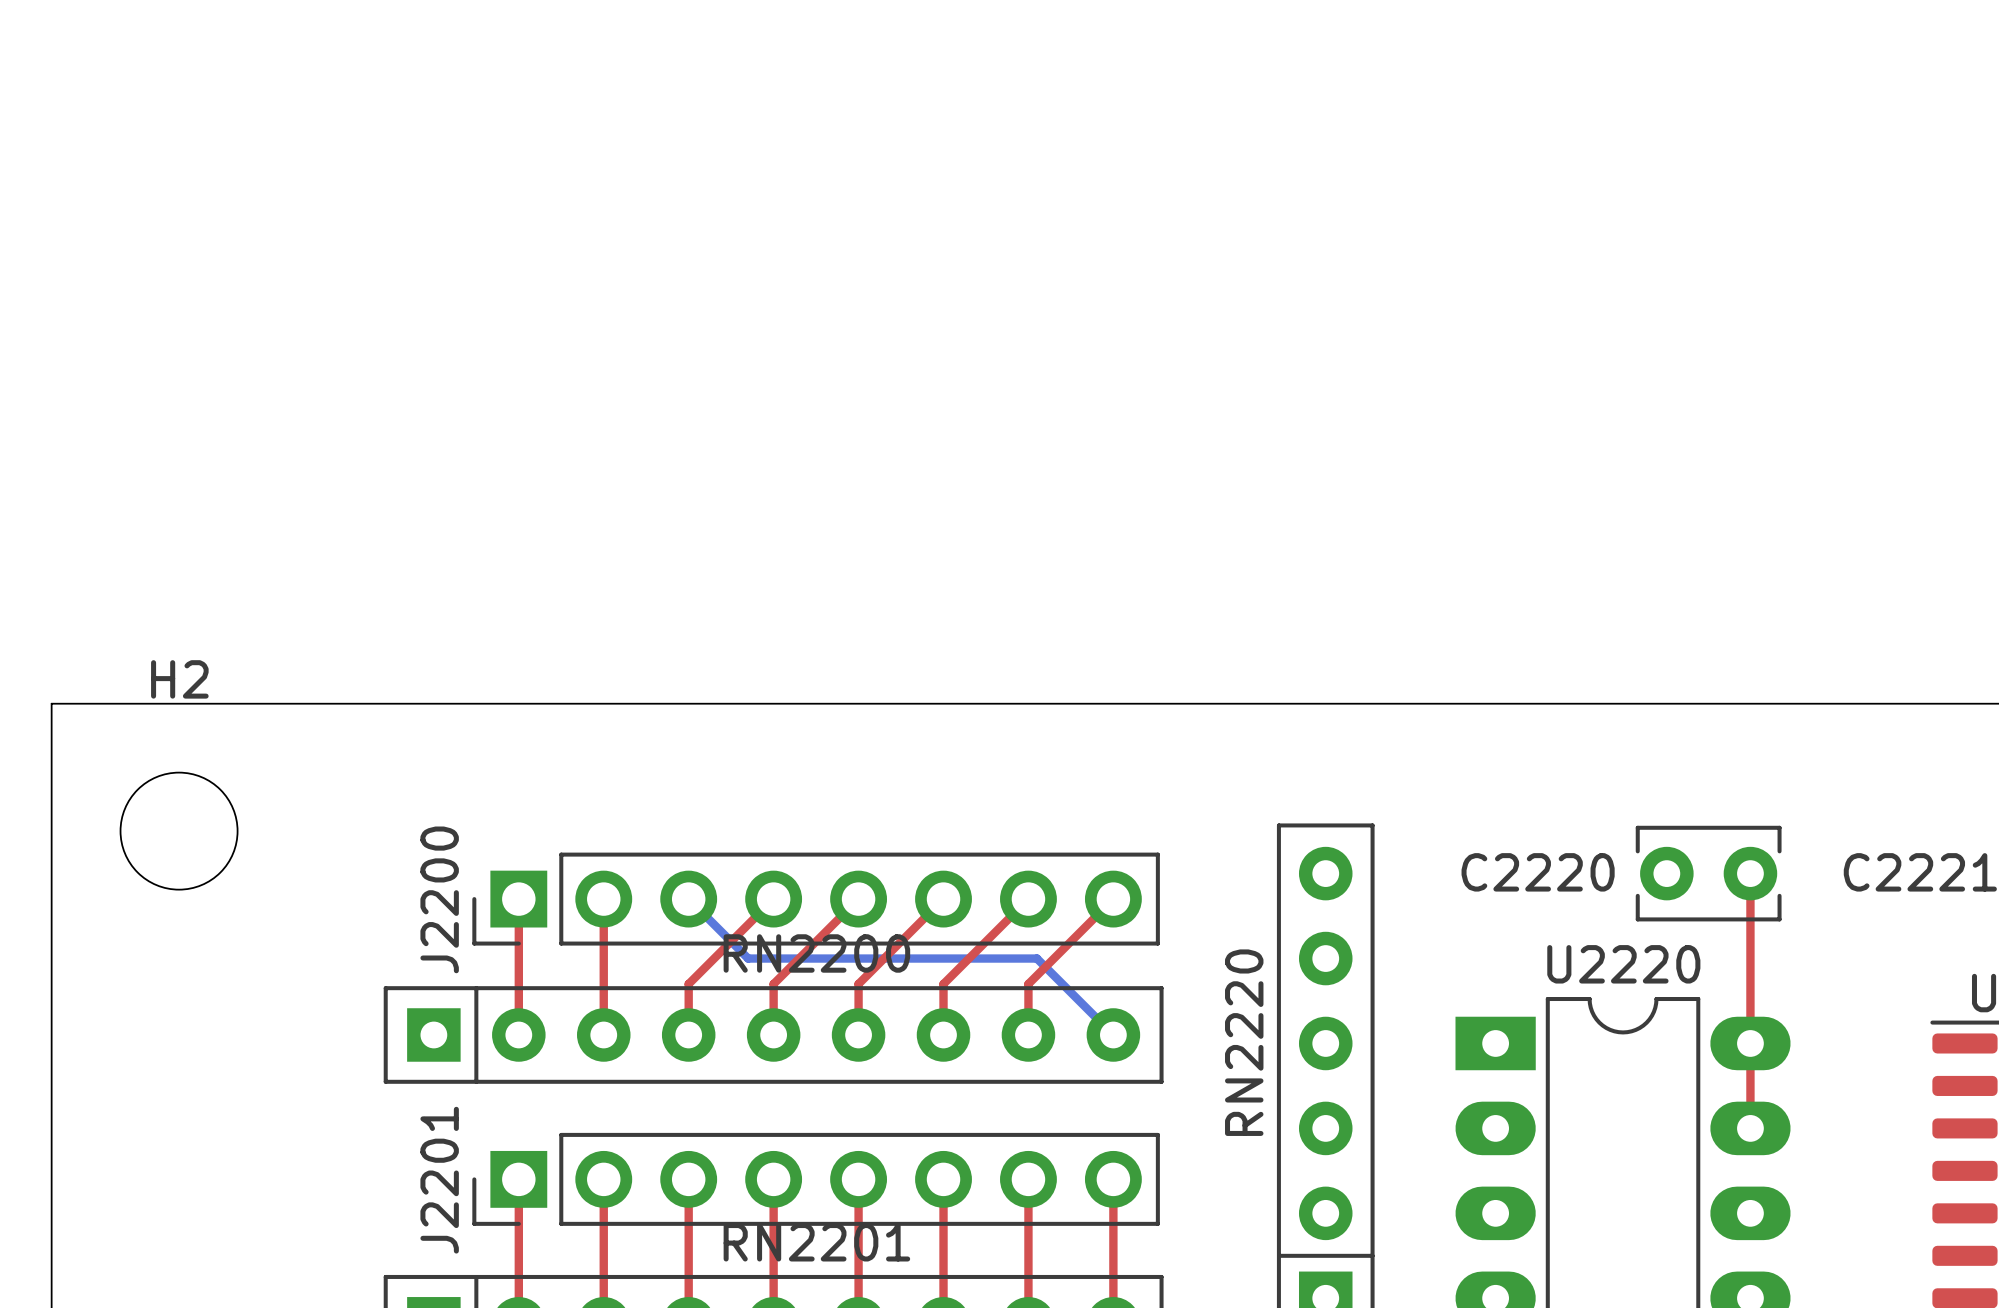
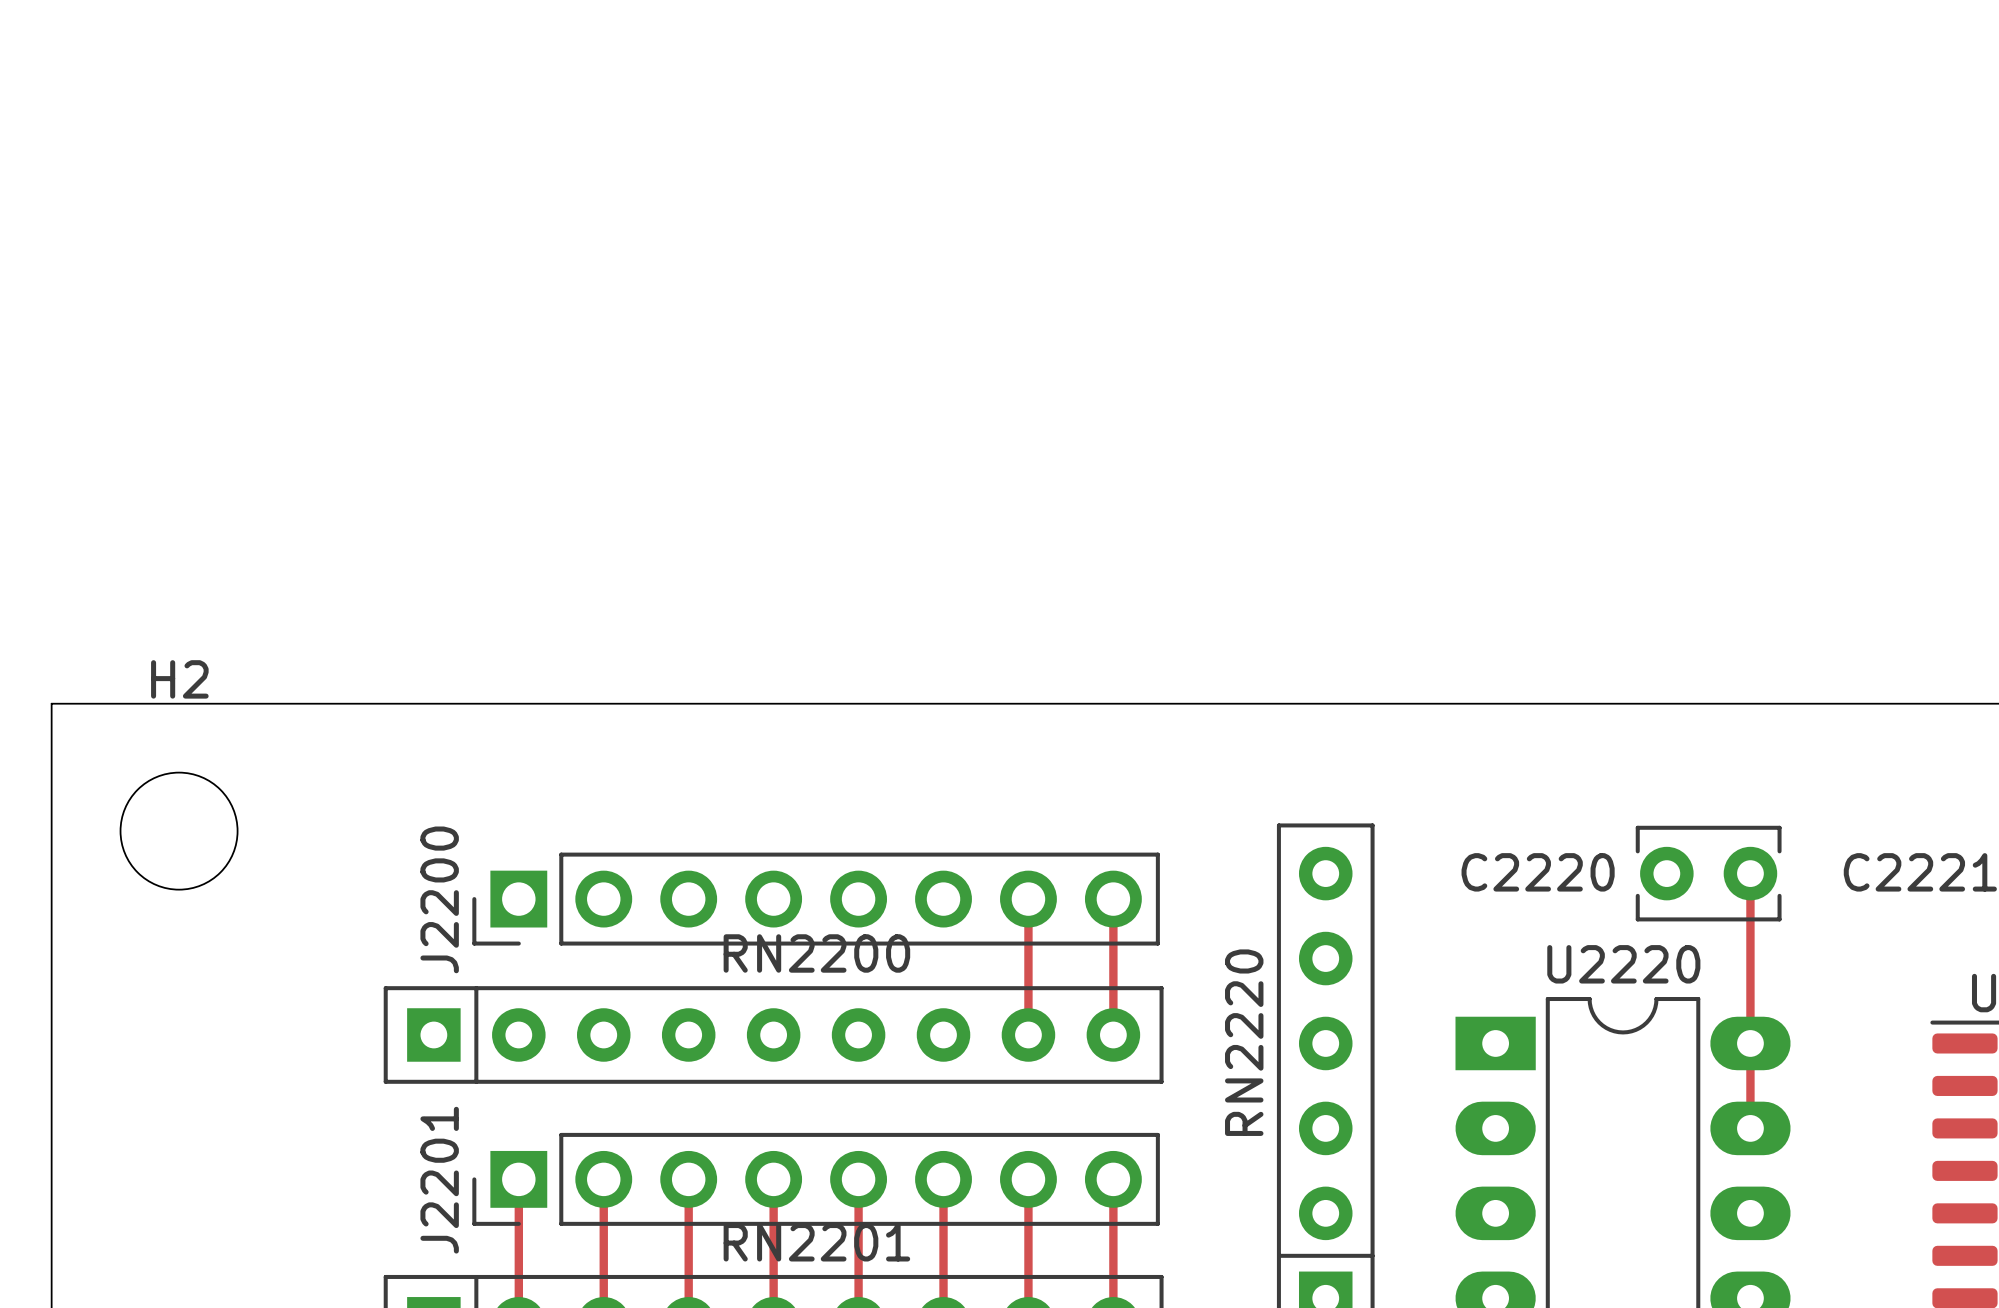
top track: (518, 899) (518, 1034) -> none
top track: (603, 899) (603, 1034) -> (1113, 899) (1113, 1034)
bottom track: (688, 899) (748, 958) (1036, 958) (1113, 1034) -> none
top track: (773, 899) (688, 984) (688, 1034) -> none
top track: (858, 899) (773, 984) (773, 1034) -> none
top track: (943, 899) (858, 984) (858, 1034) -> none
top track: (1028, 899) (943, 984) (943, 1034) -> none
top track: (1113, 899) (1028, 984) -> (1028, 899) (1028, 984)

